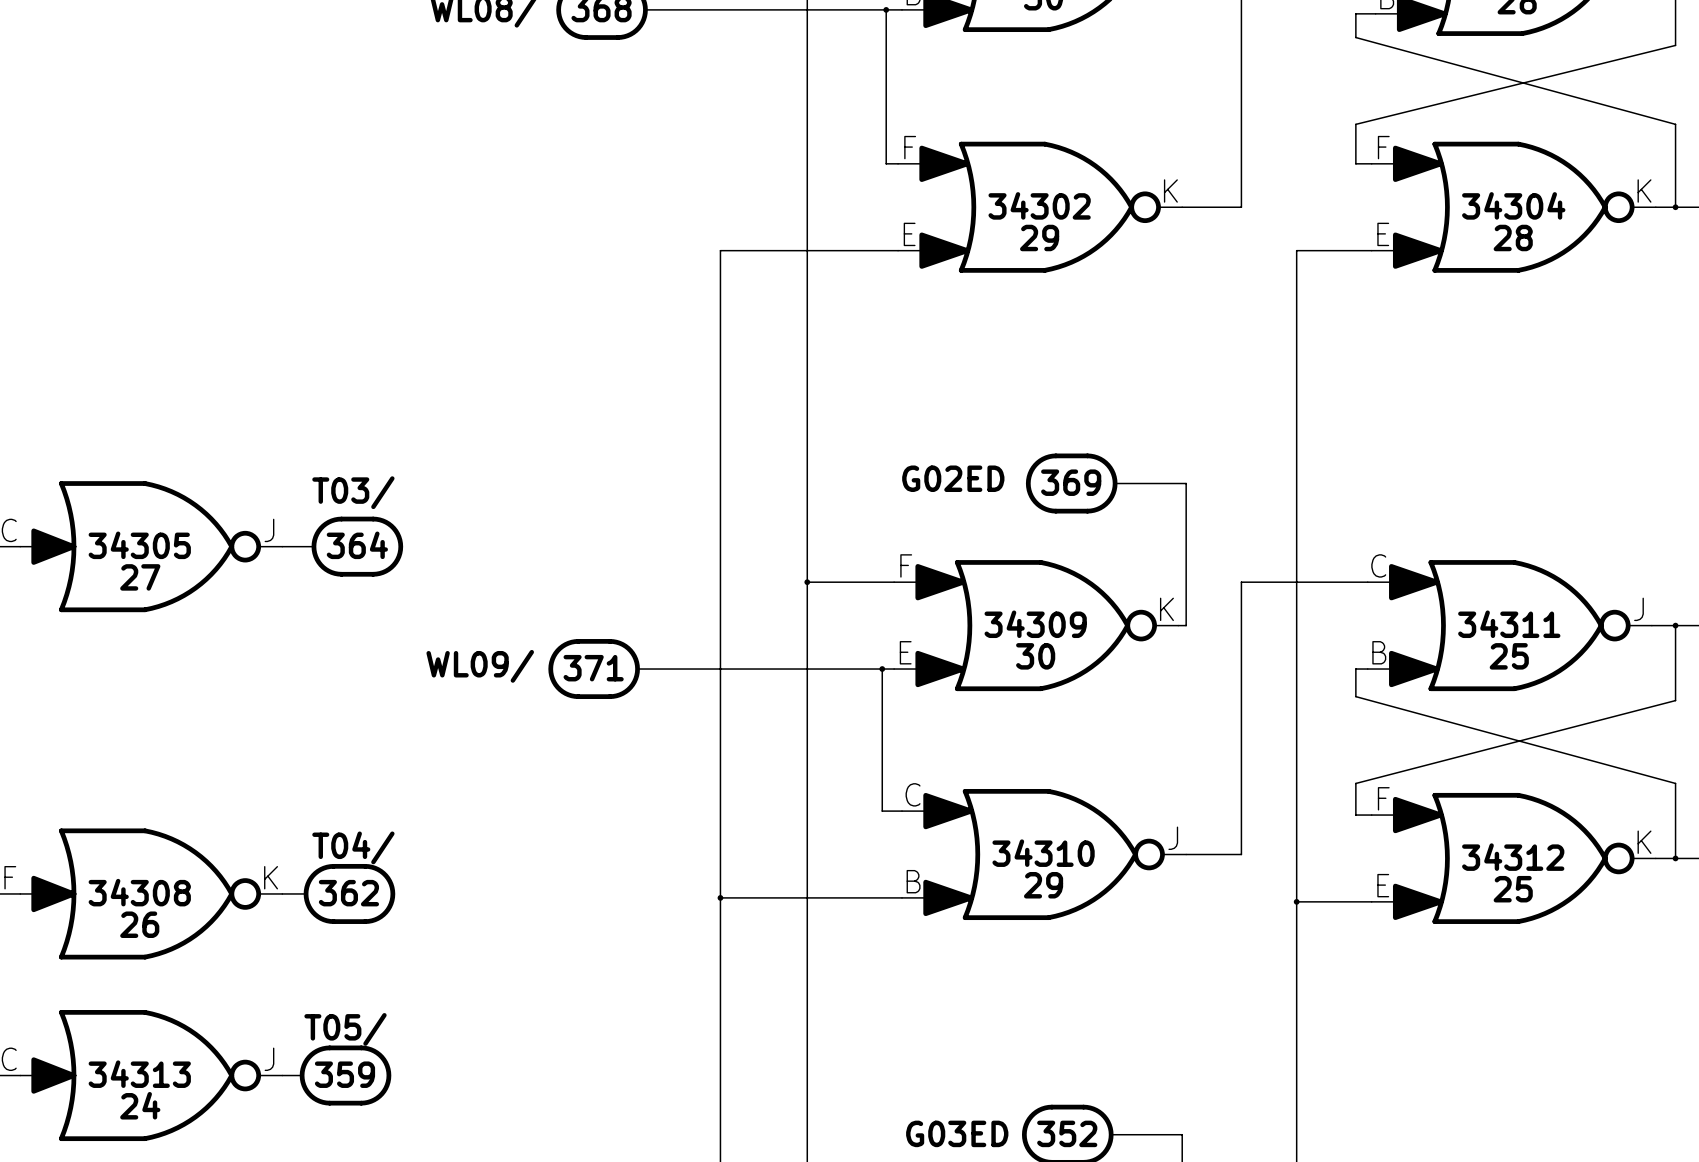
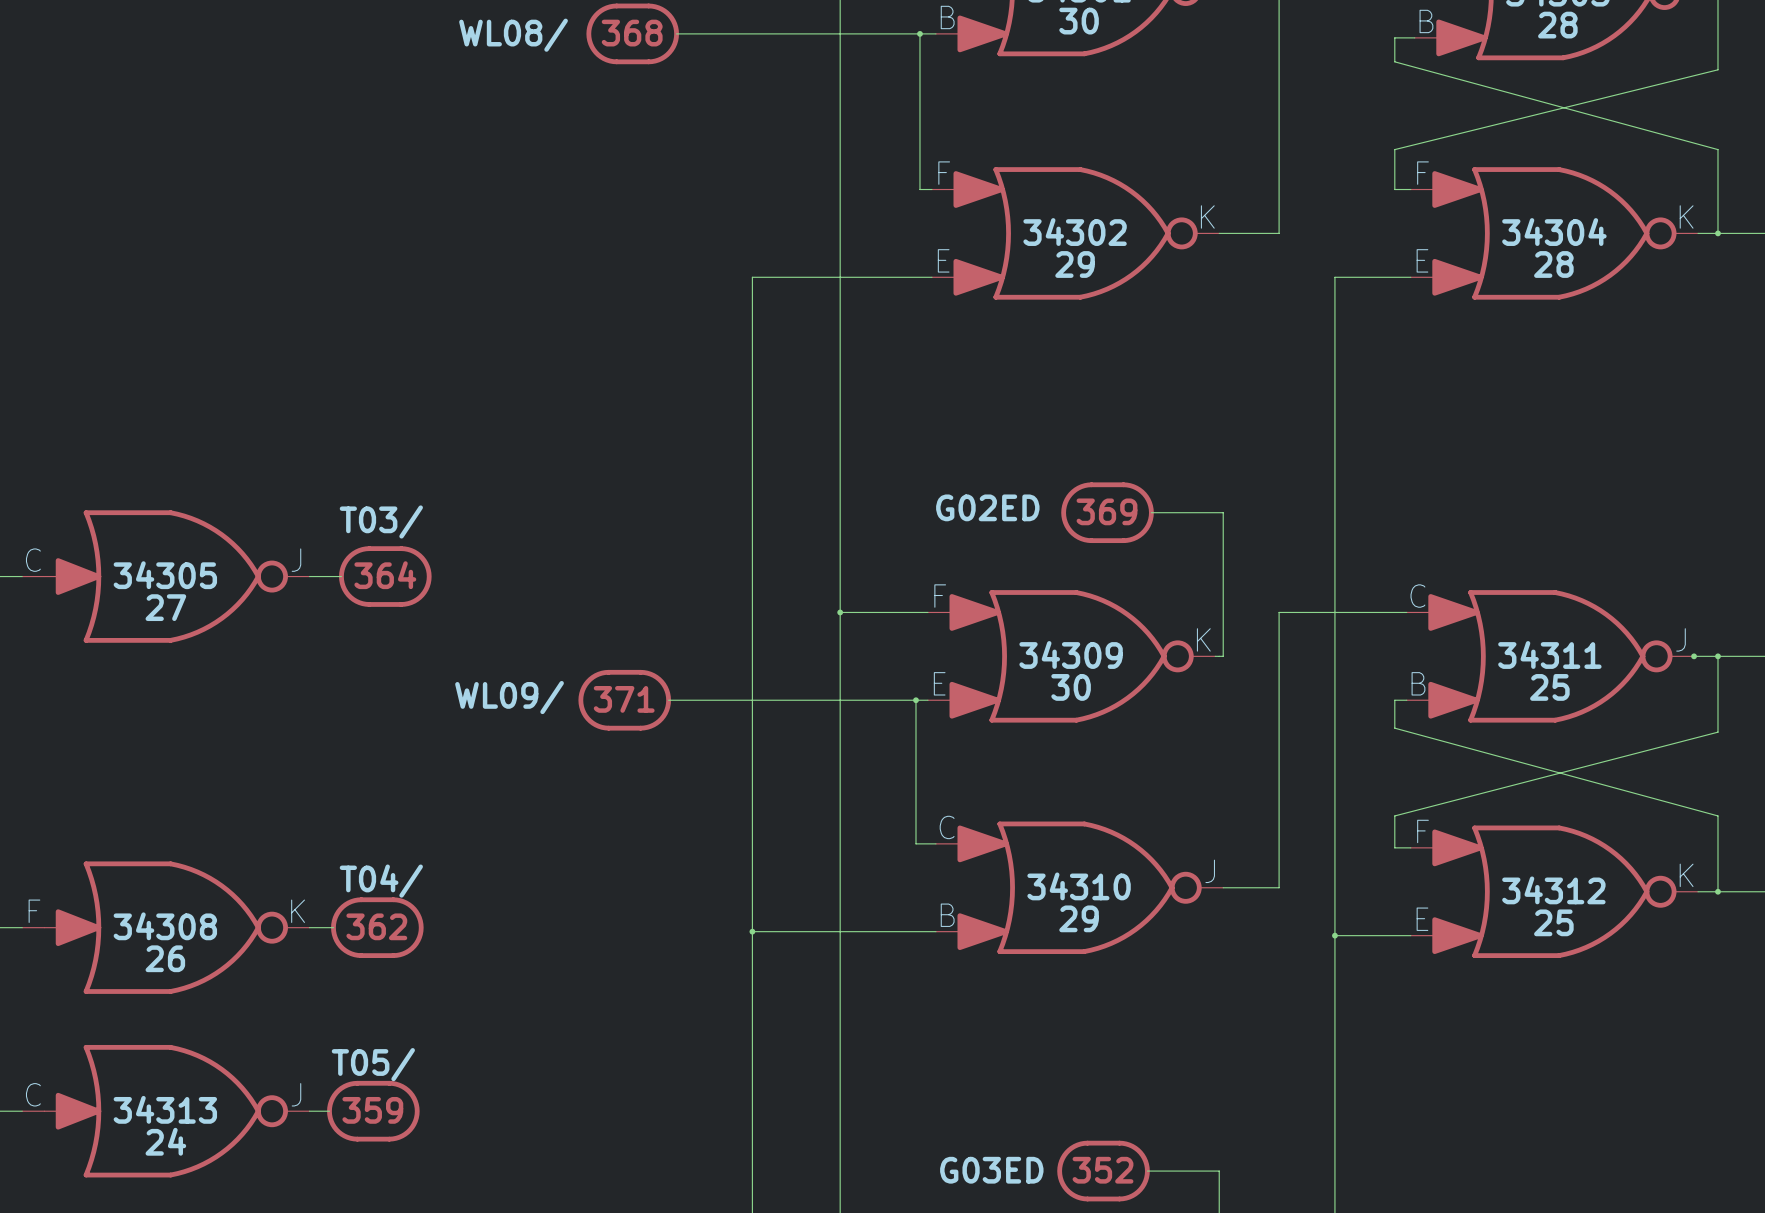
junction: none -> (1694, 656)

